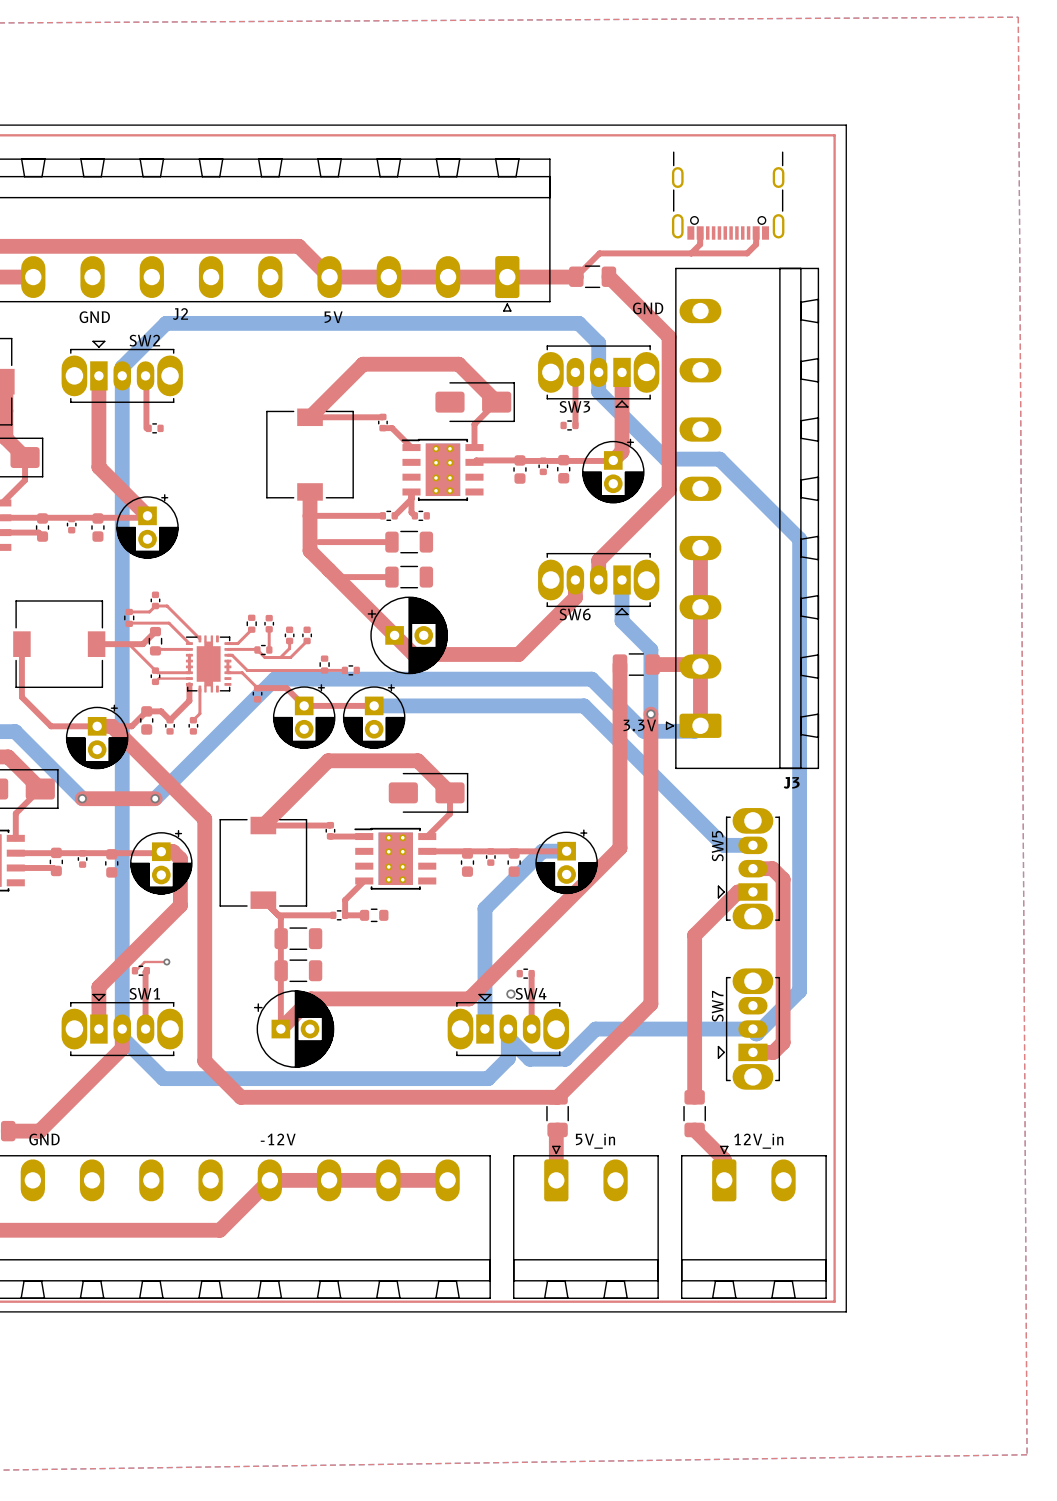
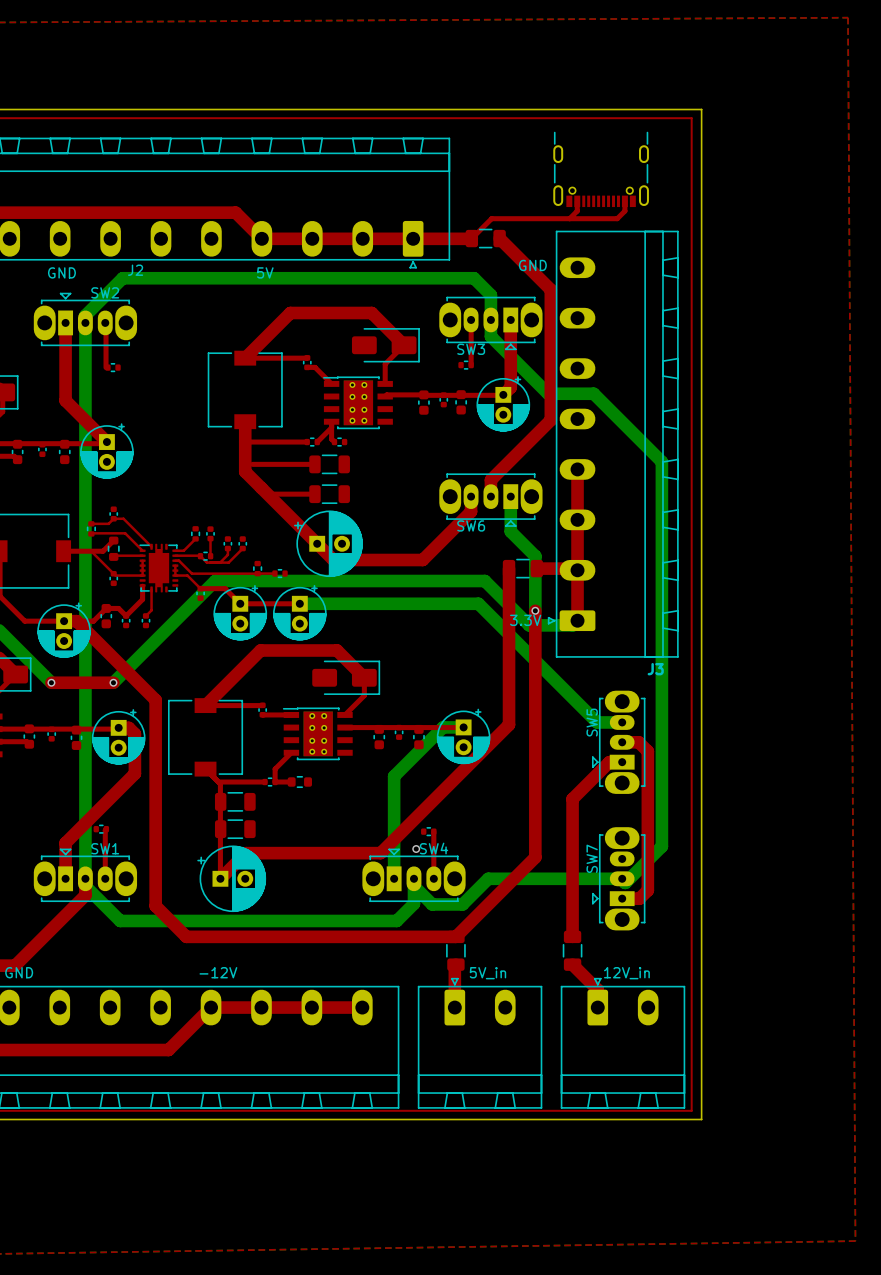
top track: (189, 678) (158, 678) (155, 681) -> none
top track: (166, 961) (144, 961) (134, 970) -> none
via: (166, 961) -> none

